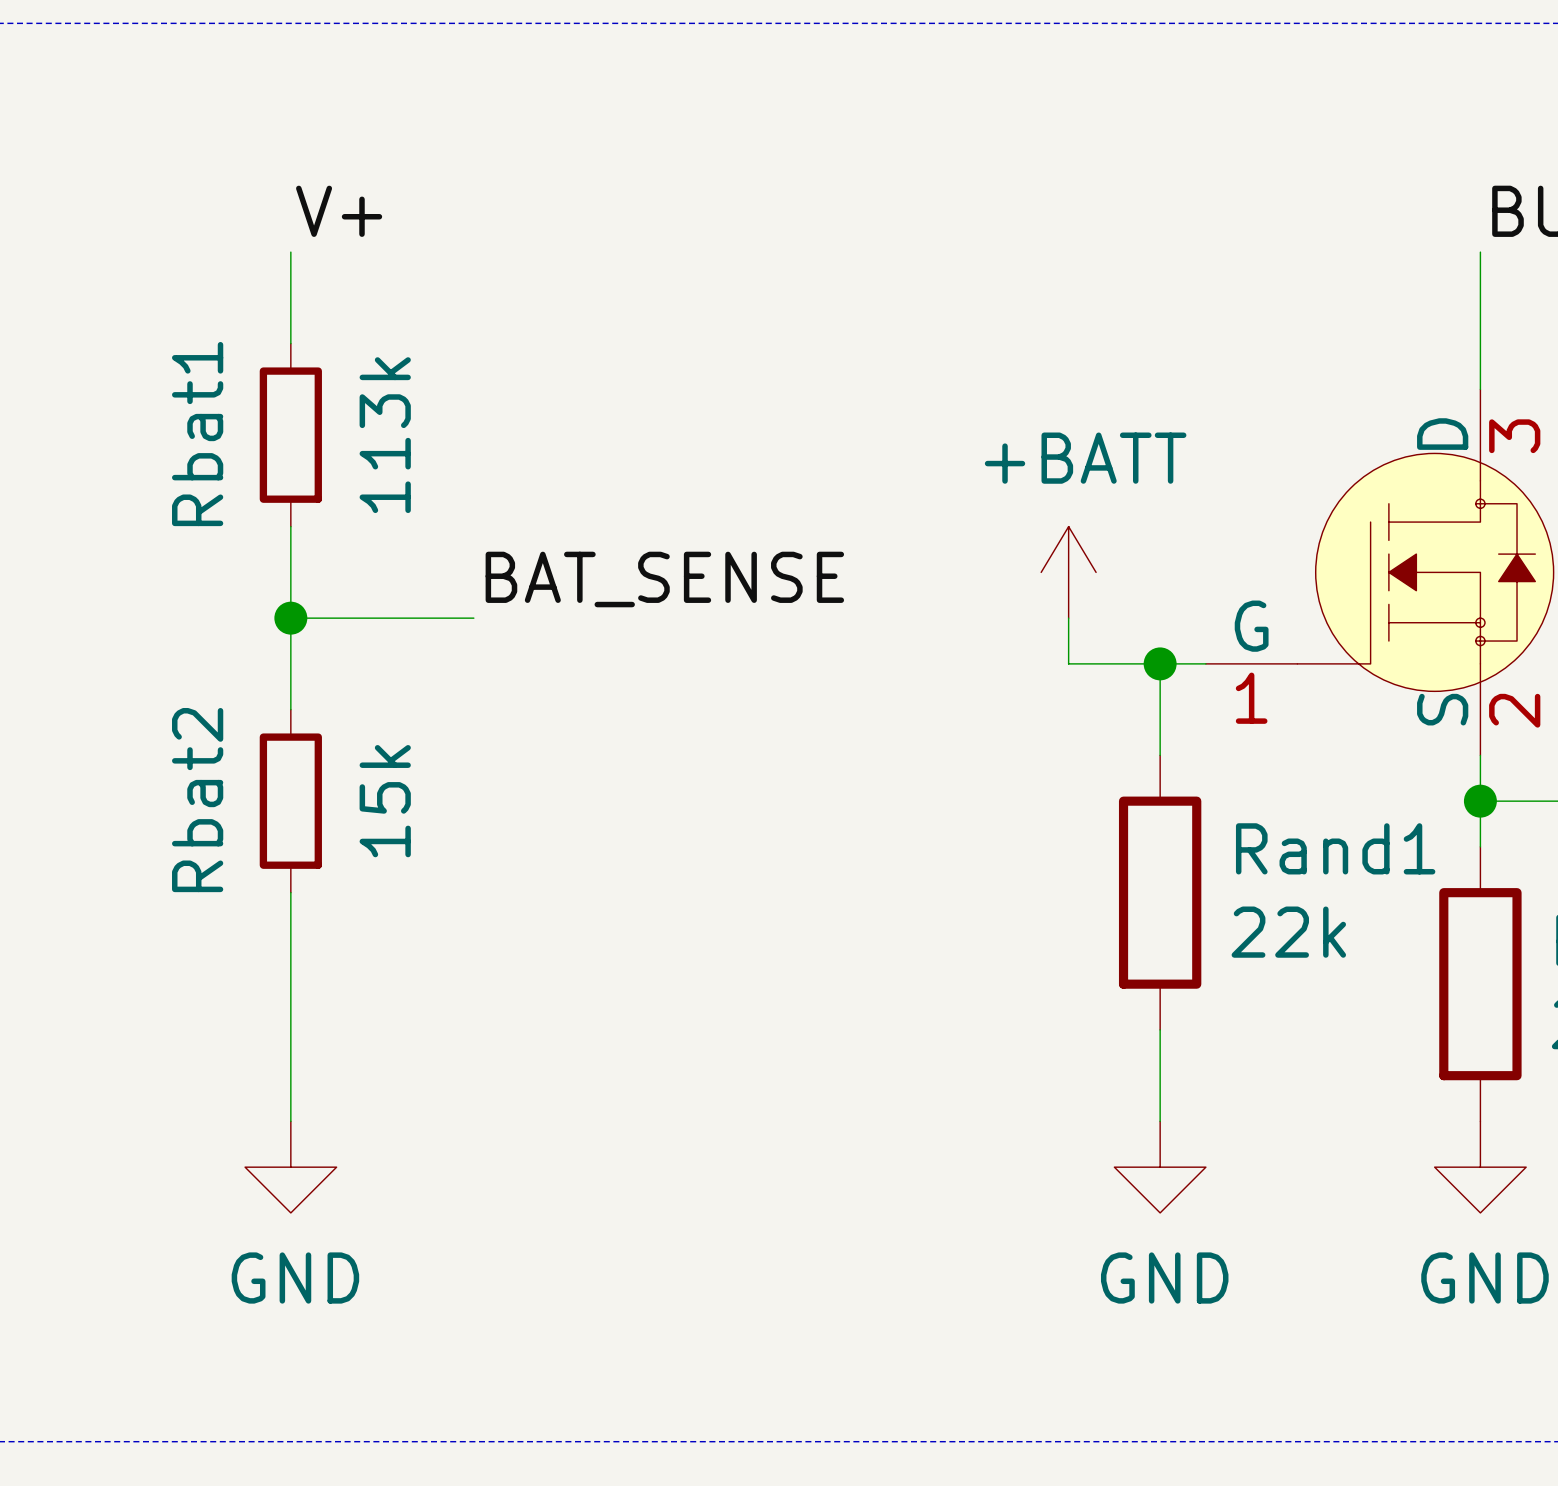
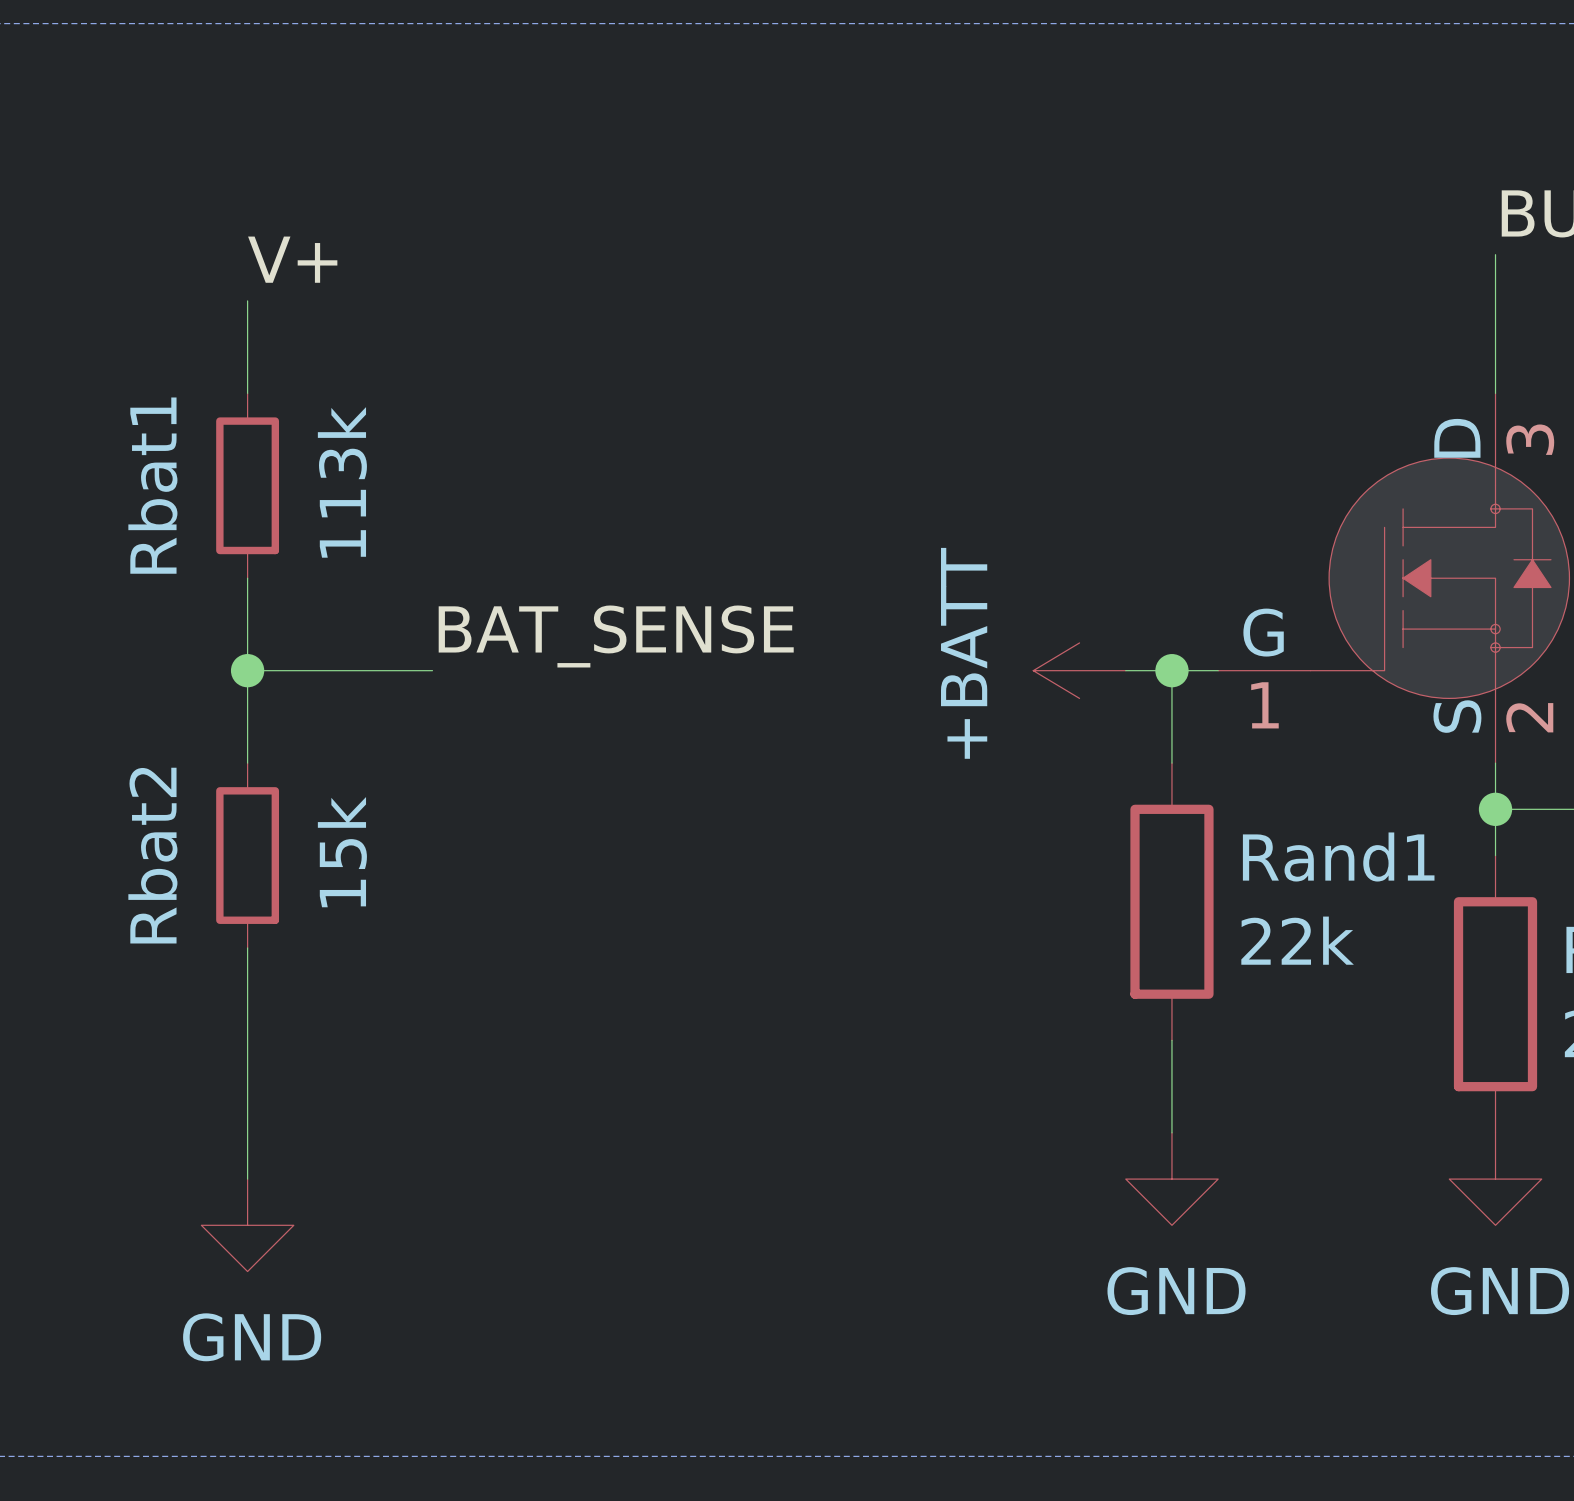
label position: V+ (339, 211) -> V+ (292, 259)
wire: (290, 252) (290, 343) -> (247, 300) (247, 393)
Rbat1 position: (290, 435) -> (247, 485)
wire: (290, 526) (290, 709) -> (247, 578) (247, 763)
power symbol rotation: 0° (1068, 572) -> 90° counterclockwise (1079, 670)
power symbol position: +BATT (1068, 572) -> +BATT (1079, 670)
label position: BAT_SENSE (664, 579) -> BAT_SENSE (616, 636)
wire: (290, 618) (473, 618) -> (247, 670) (432, 670)
junction position: (290, 618) -> (247, 670)
wire: (1068, 618) (1068, 663) (1114, 663) -> none
Rbat2 position: (290, 801) -> (247, 855)
wire: (290, 892) (290, 1121) -> (247, 947) (247, 1179)
power symbol position: GND (290, 1167) -> GND (247, 1225)

